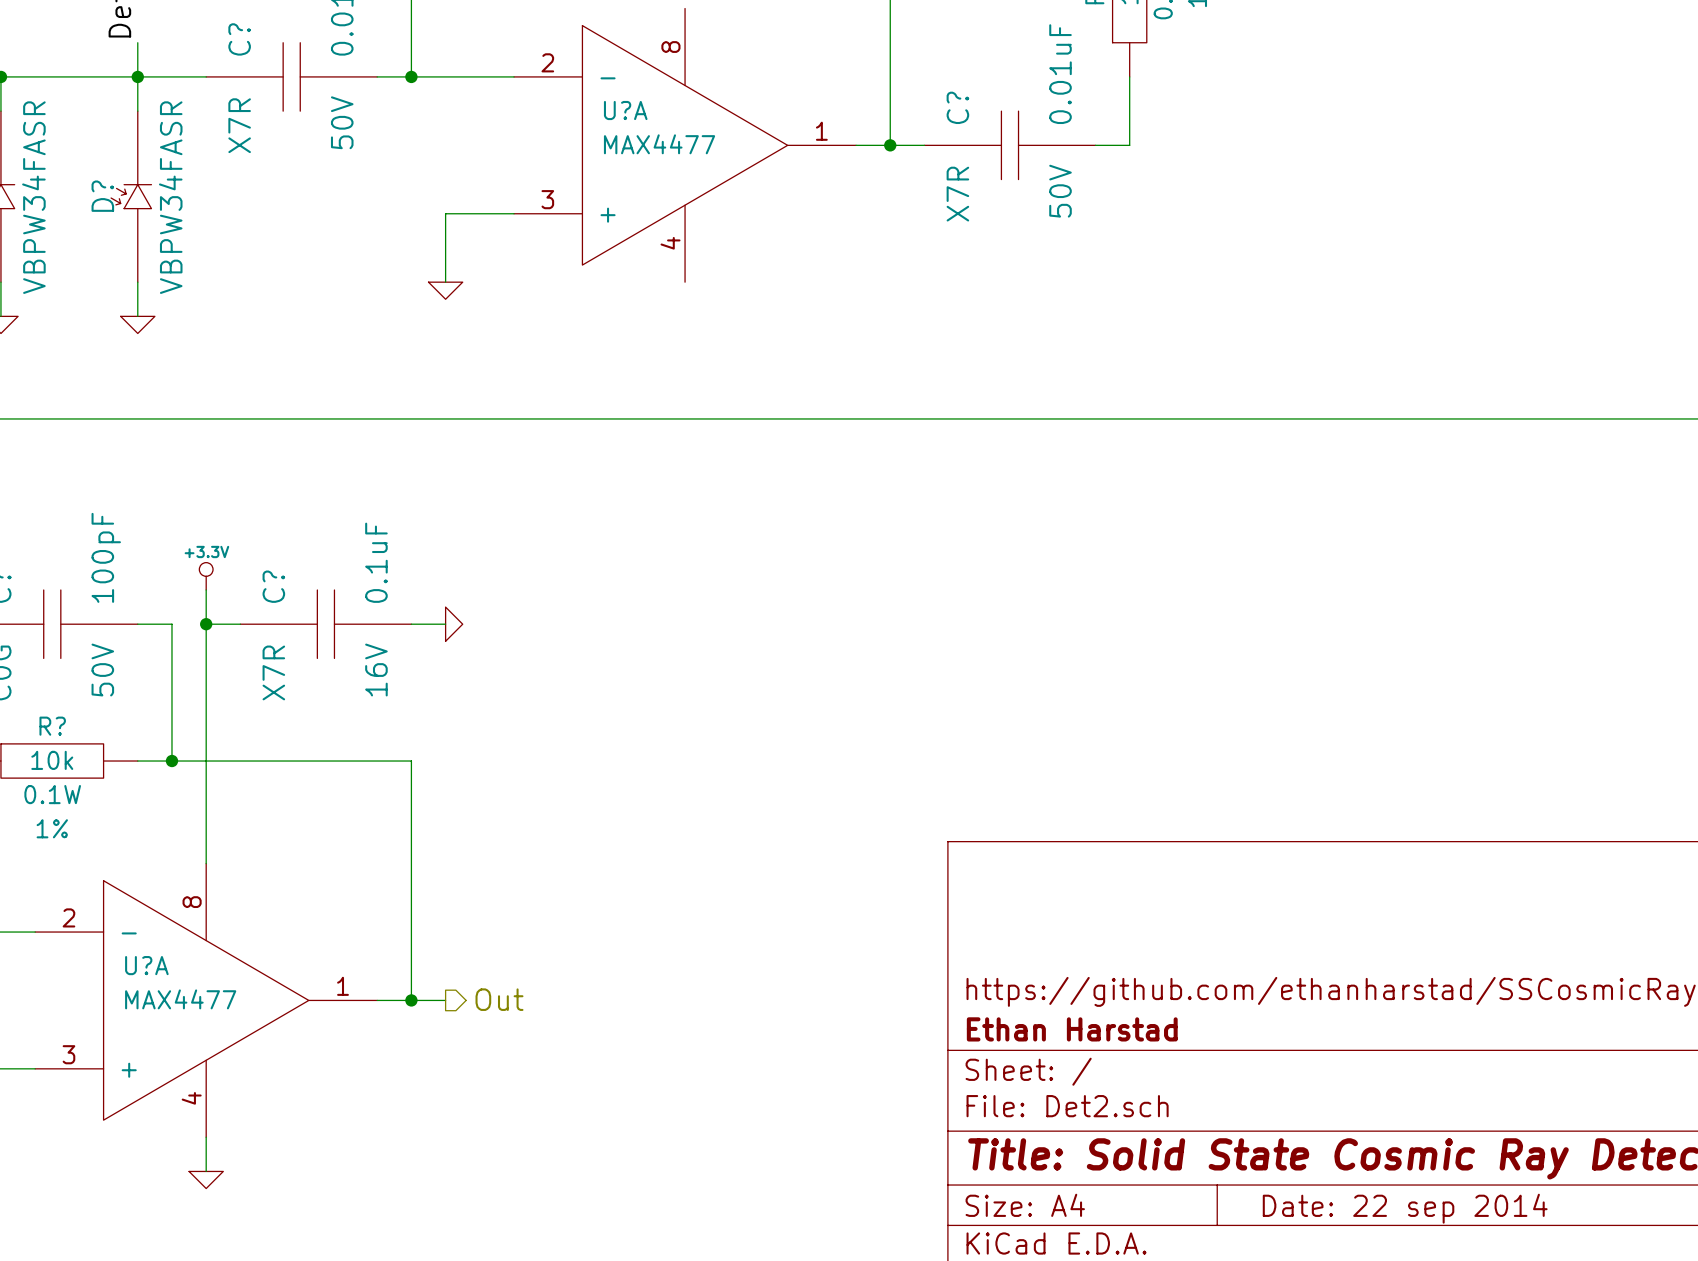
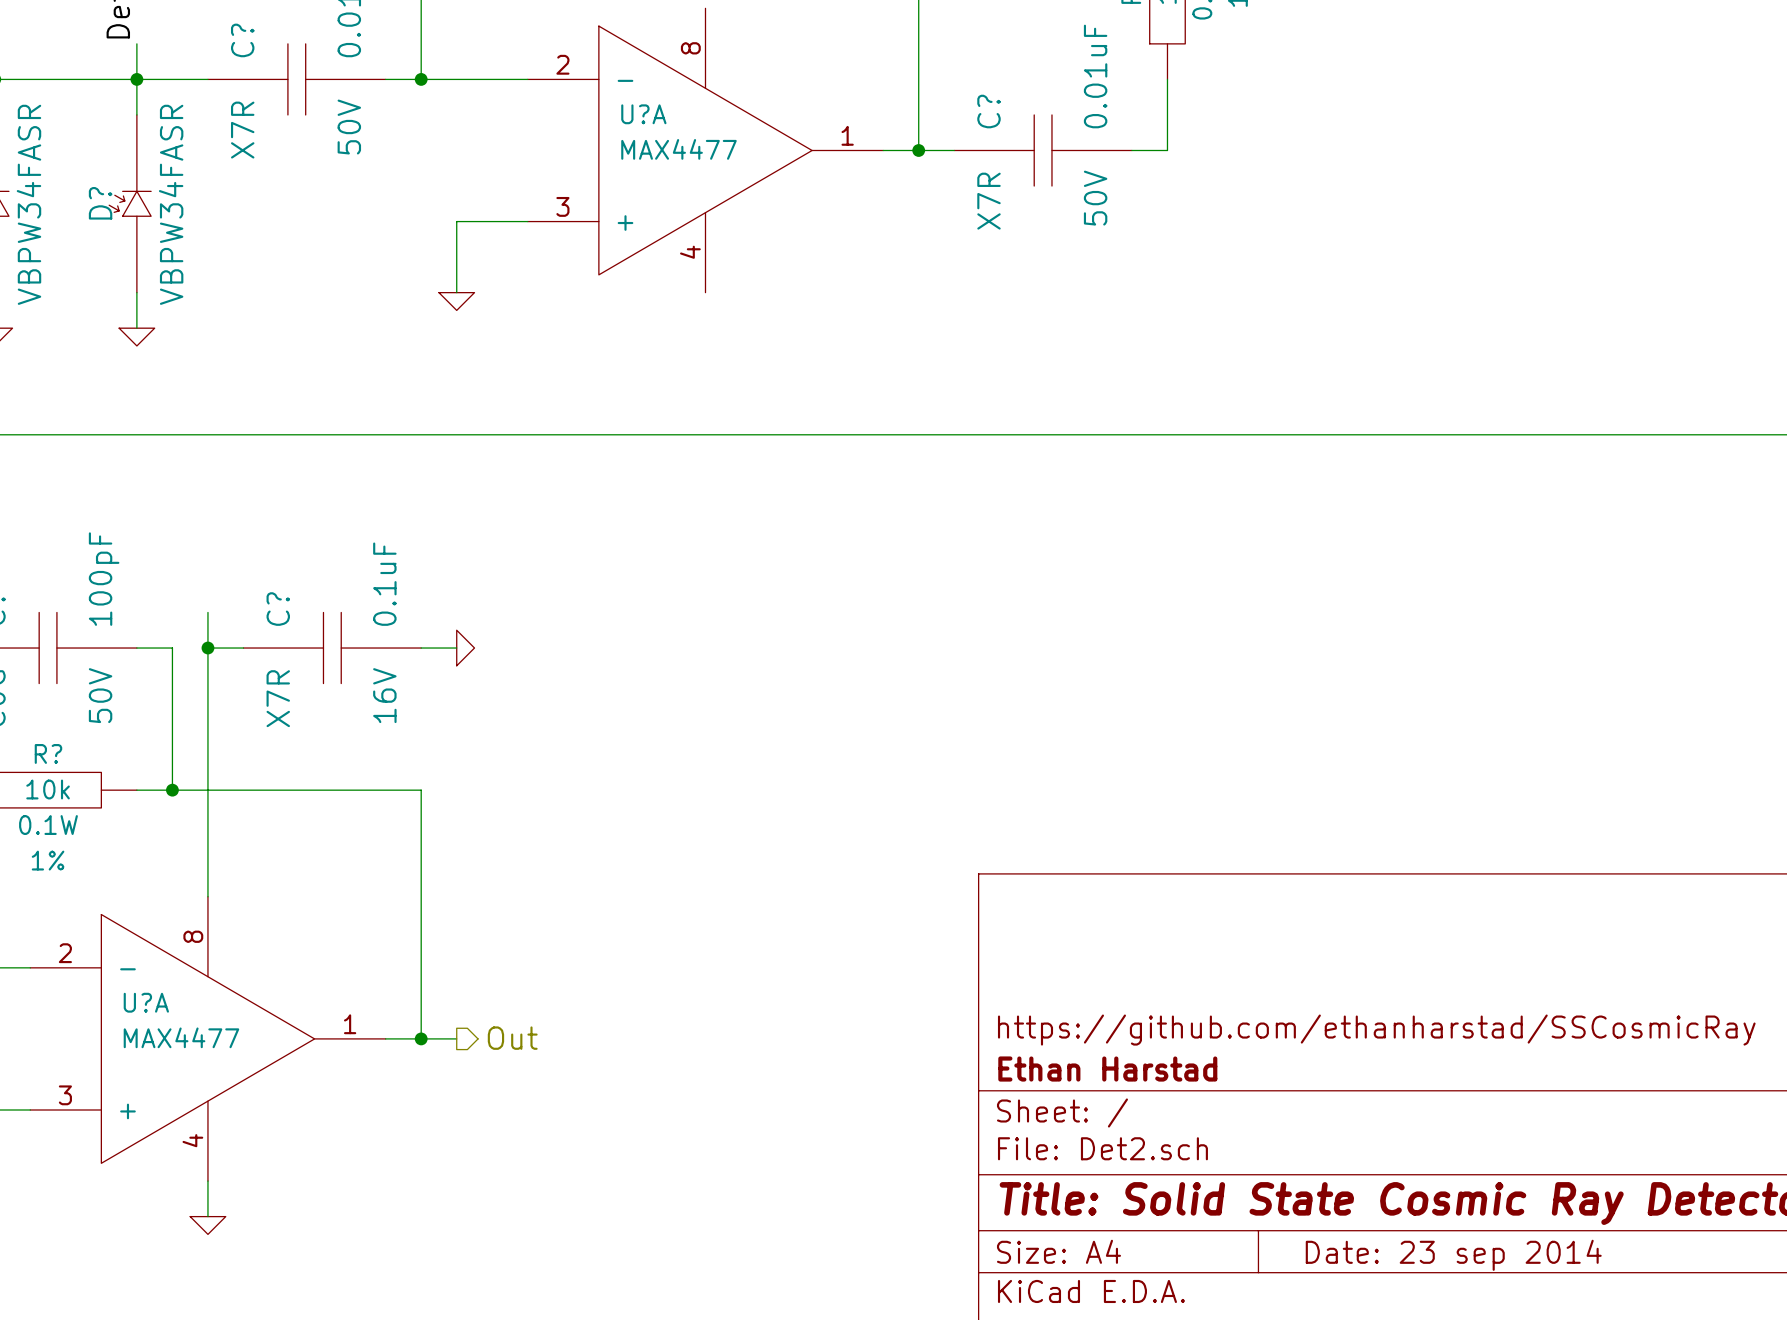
power symbol: +3.3V (206, 576) -> none
title block: Date: 22 sep 2014 (1405, 1208) -> Date: 23 sep 2014 (1453, 1255)

